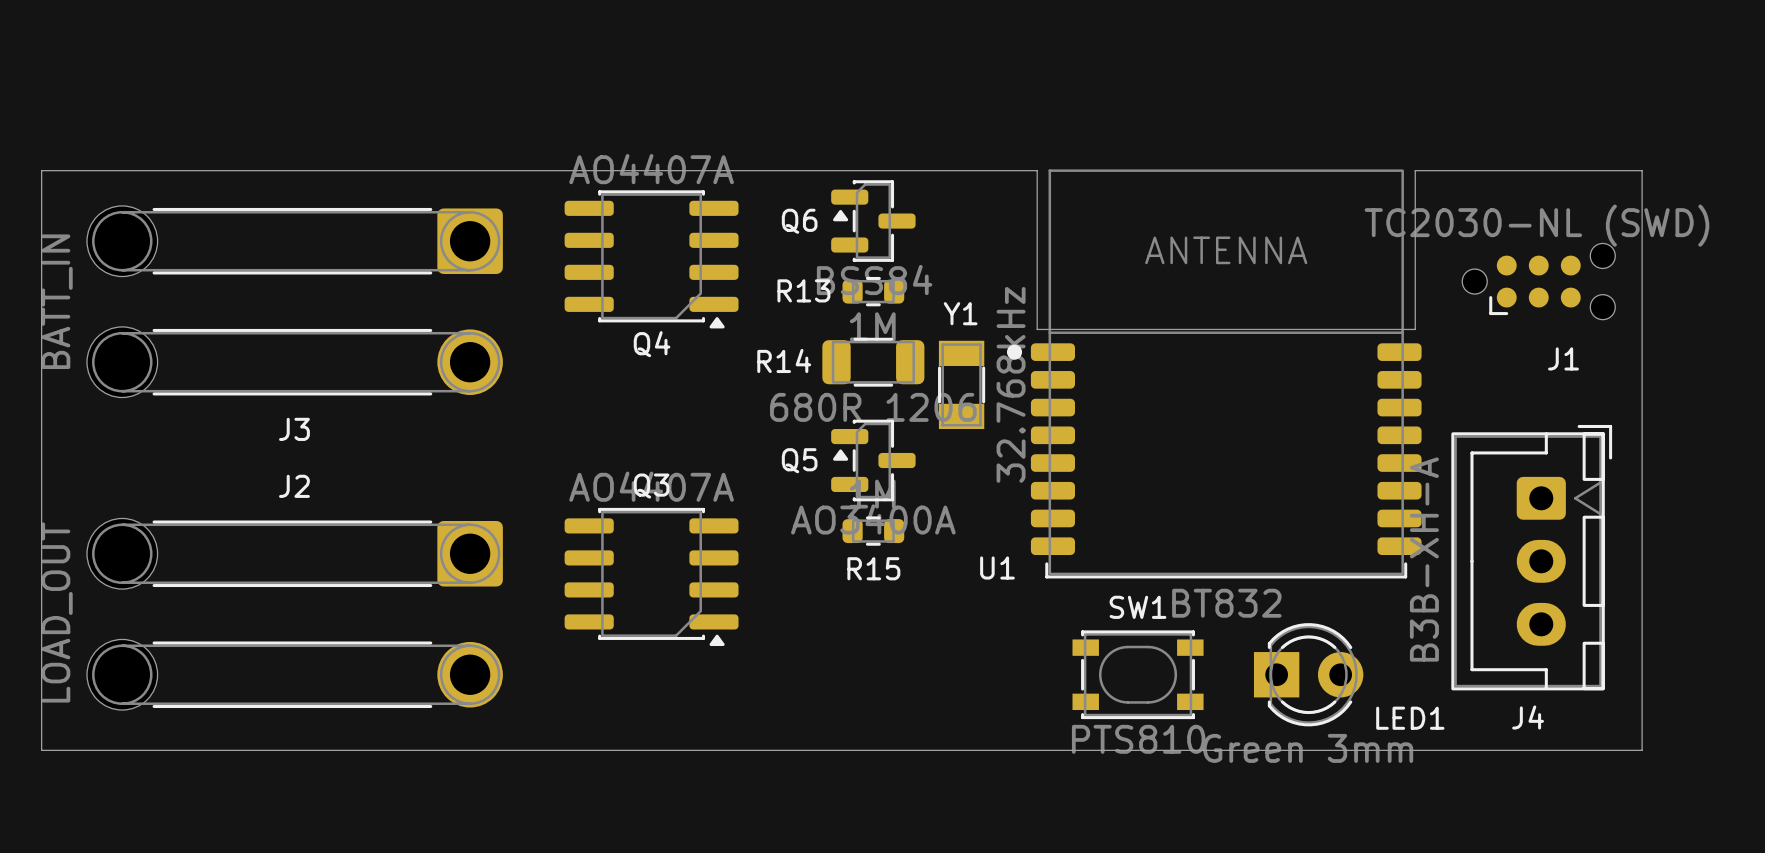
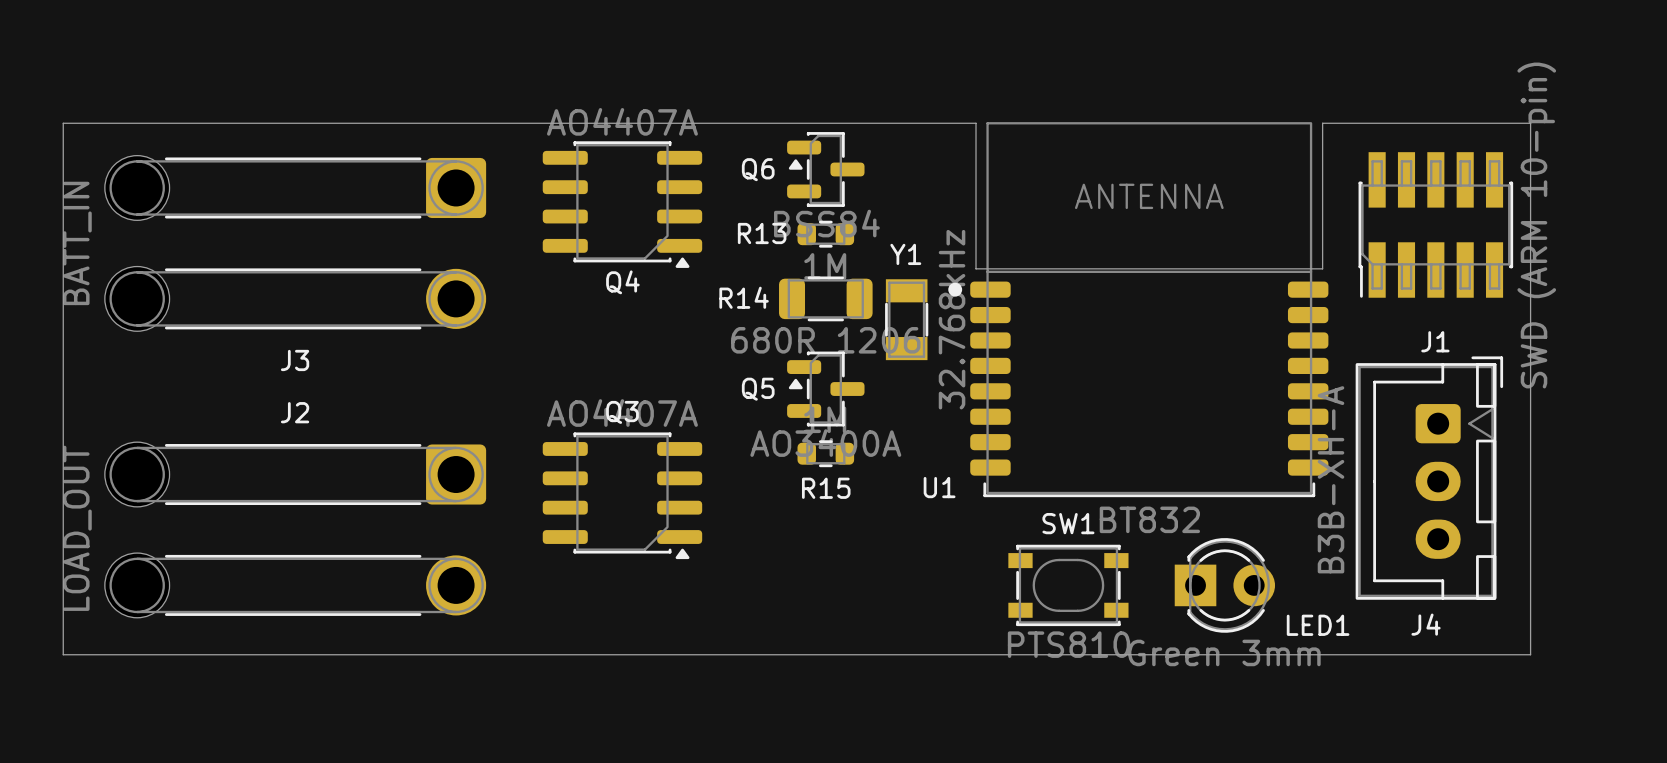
J1 value: TC2030-NL (SWD) (1536, 225) -> SWD (ARM 10-pin) (1536, 225)
J1 footprint: [1462, 243, 1616, 320] -> [1358, 152, 1514, 298]
J1 name position: J1 (1563, 358) -> J1 (1435, 341)

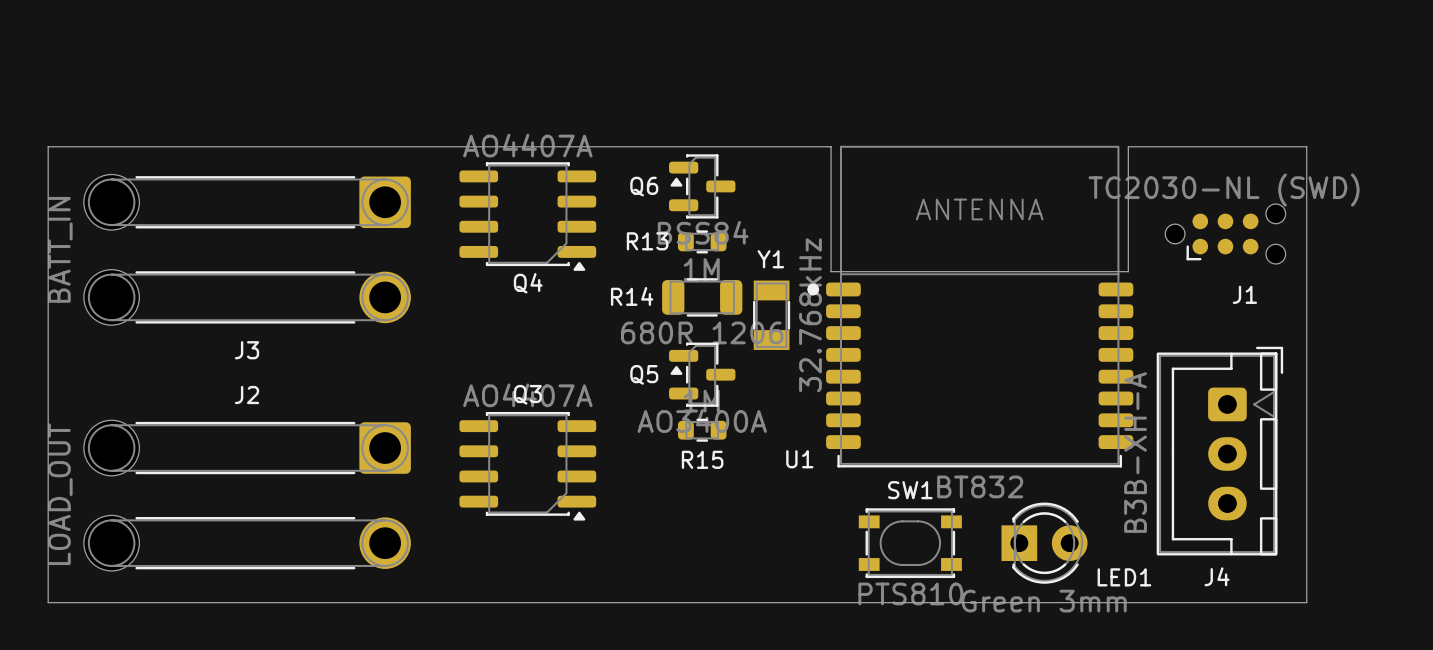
J1 footprint: [1358, 152, 1514, 298] -> [1165, 204, 1286, 264]
J1 value: SWD (ARM 10-pin) (1536, 225) -> TC2030-NL (SWD) (1224, 190)
J1 name position: J1 (1435, 341) -> J1 (1244, 294)

